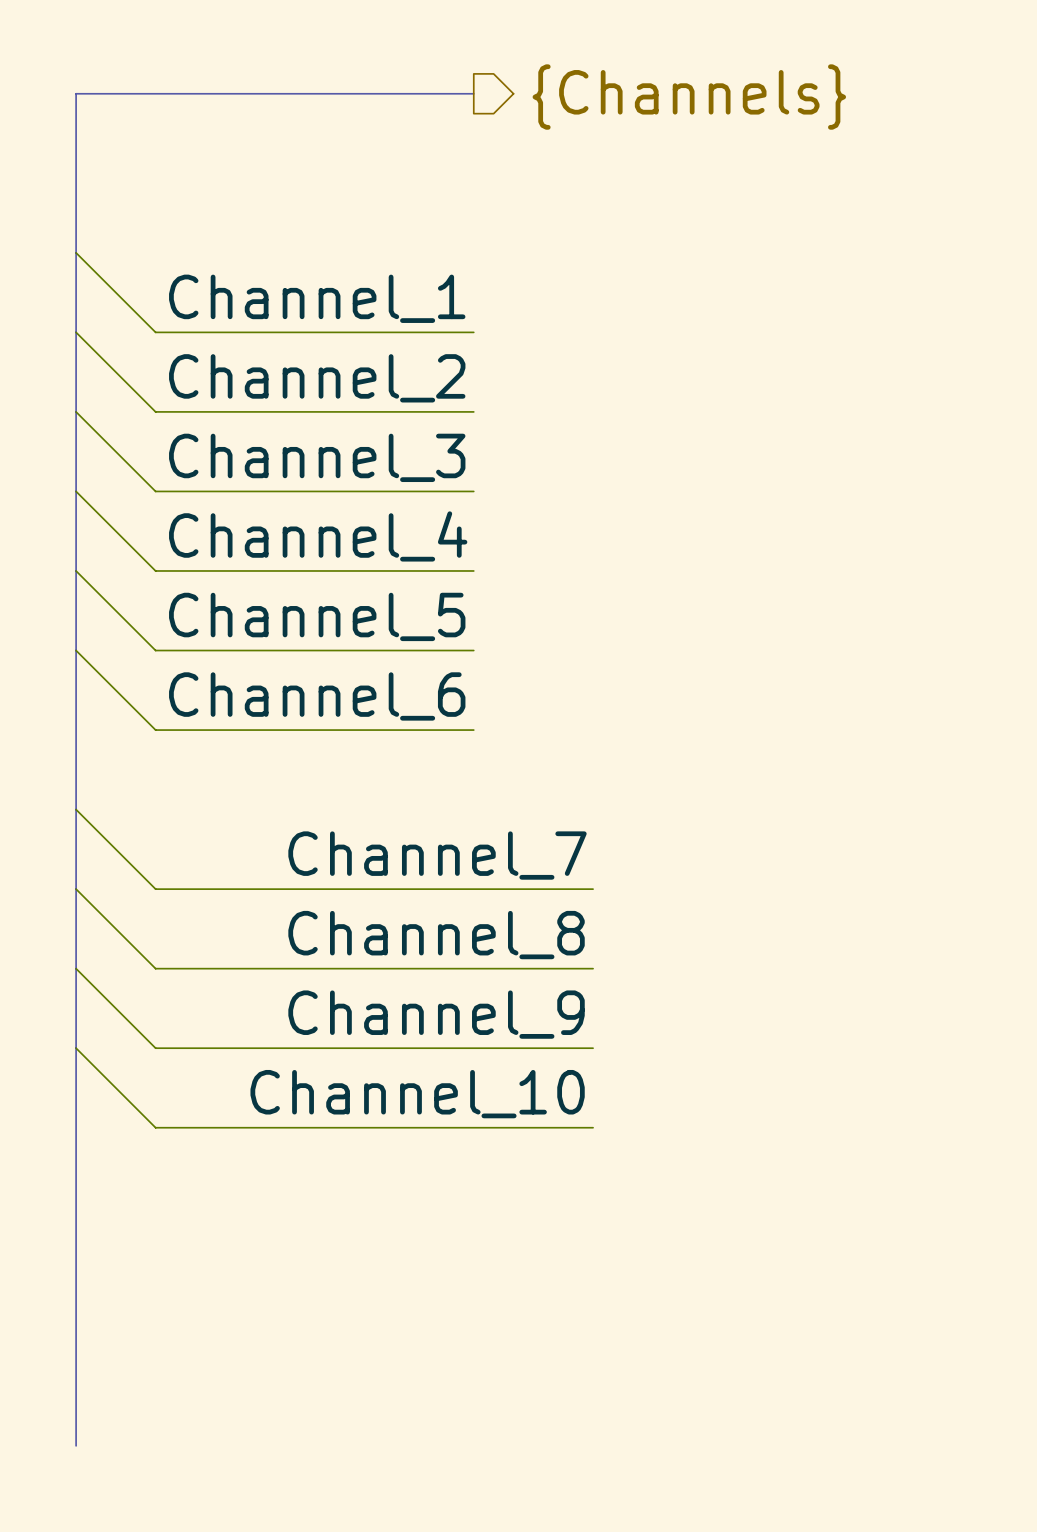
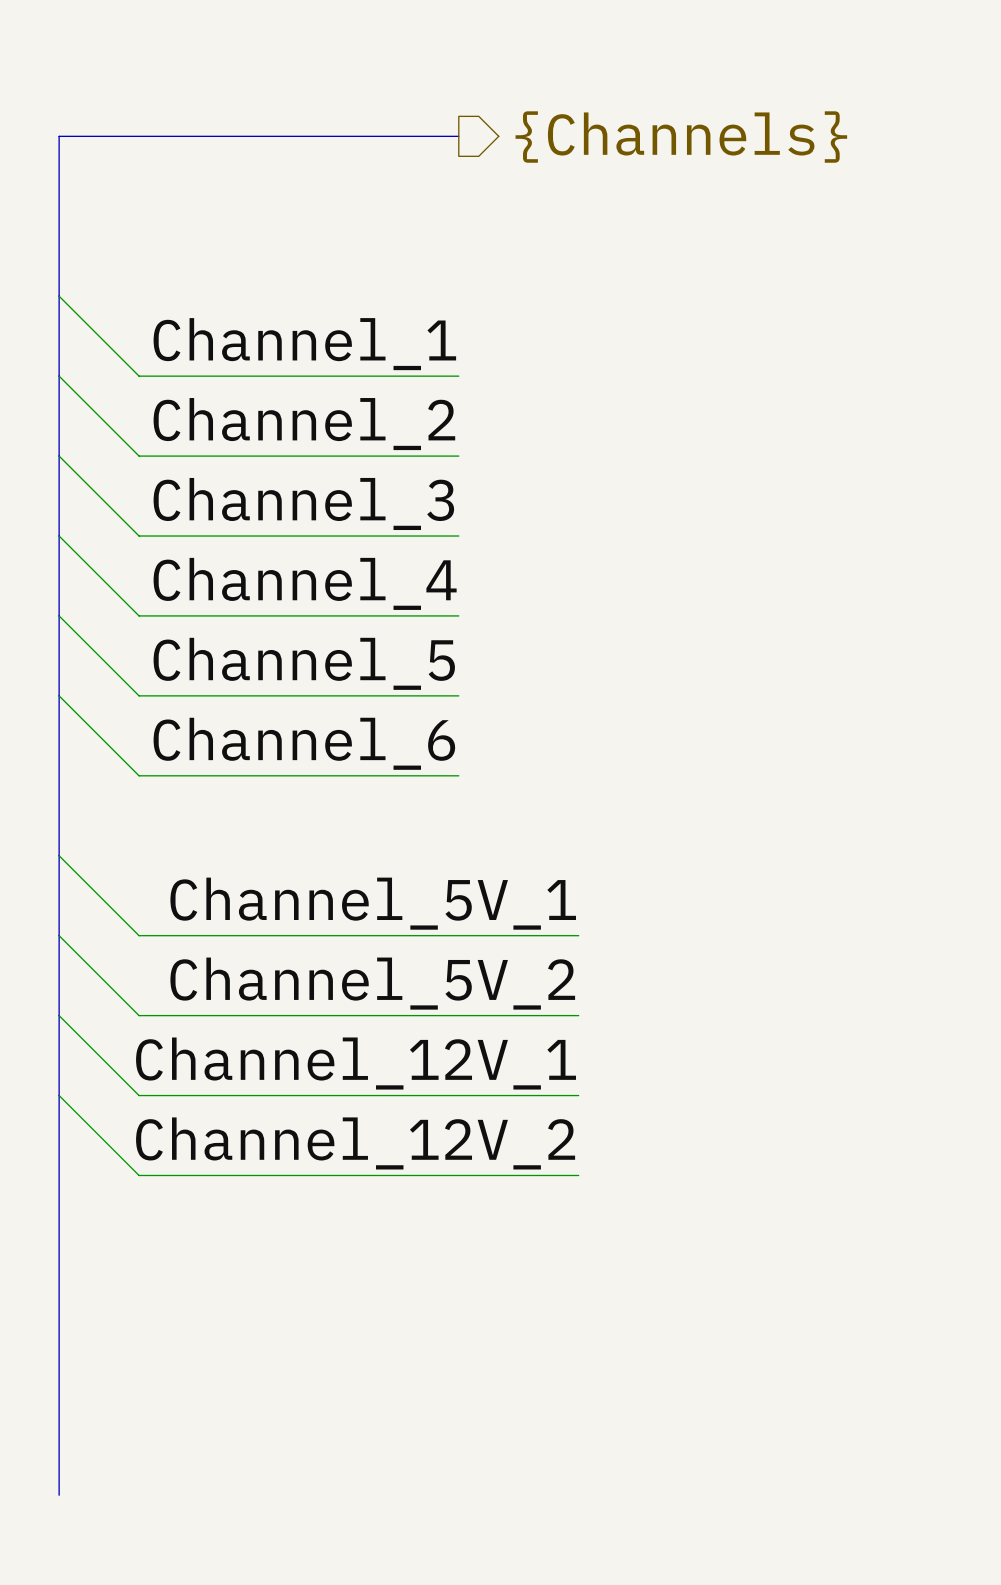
label: Channel_7 (437, 855) -> Channel_5V_1 (373, 903)
label: Channel_8 (436, 935) -> Channel_5V_2 (372, 983)
label: Channel_9 (436, 1014) -> Channel_12V_1 (356, 1063)
label: Channel_10 (417, 1094) -> Channel_12V_2 (355, 1143)

